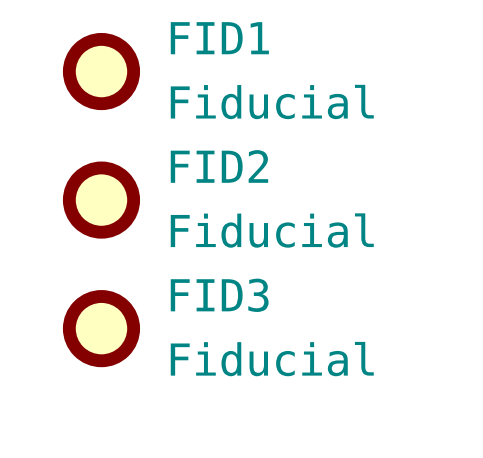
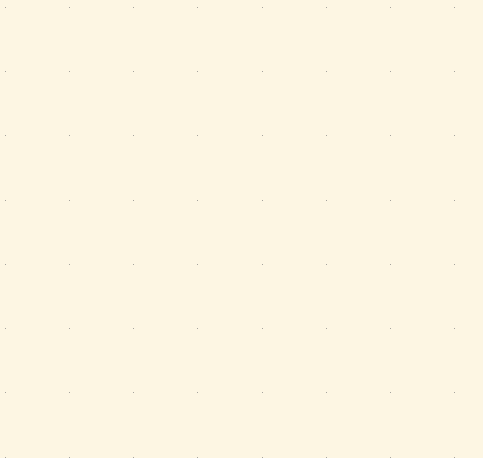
FID1: Fiducial (101, 71) -> none
FID2: Fiducial (101, 200) -> none
FID3: Fiducial (101, 328) -> none

